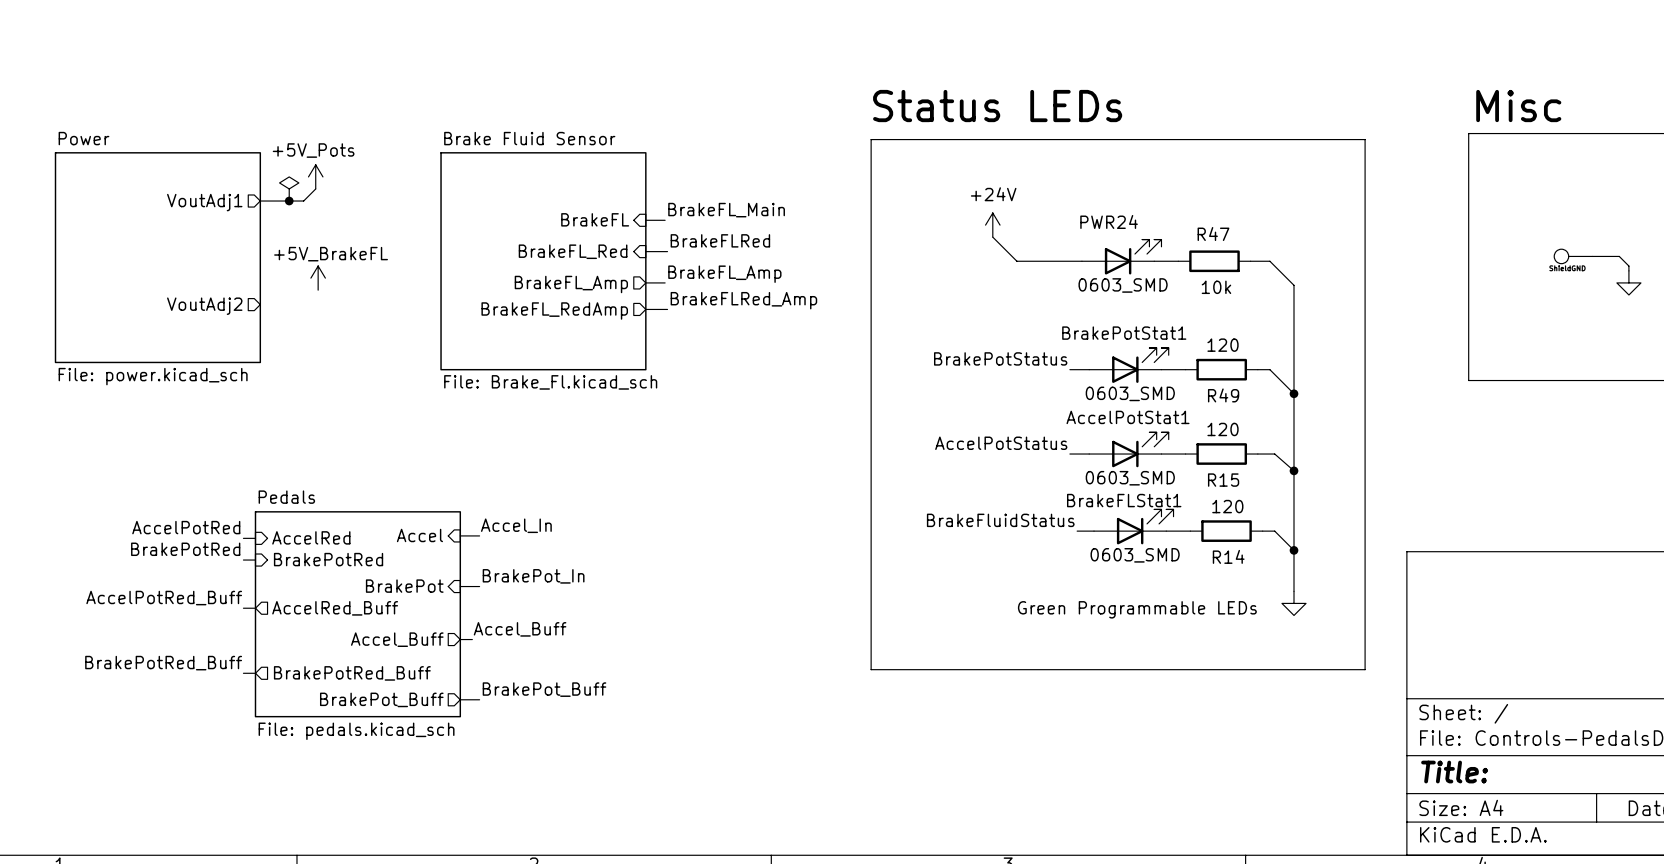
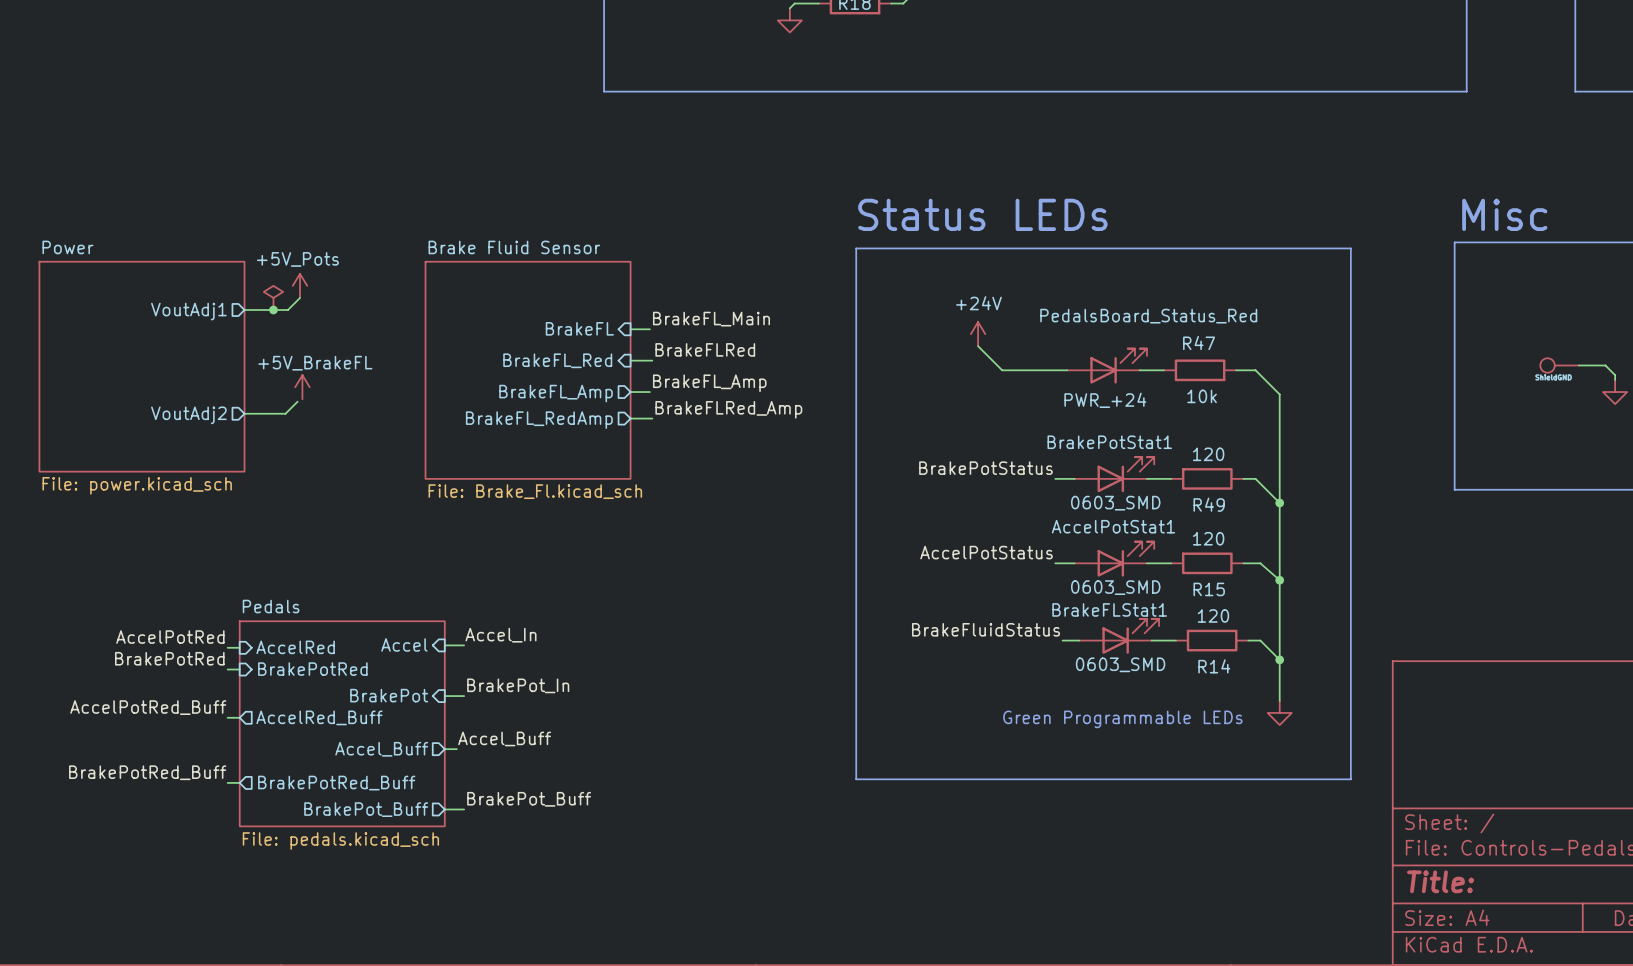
PWR24 name: PWR24 (1109, 221) -> PWR_+24 (1105, 400)
PWR24 value: 0603_SMD (1123, 285) -> PedalsBoard_Status_Red (1148, 316)
wire: none -> (297, 401) (285, 413) (244, 413)

